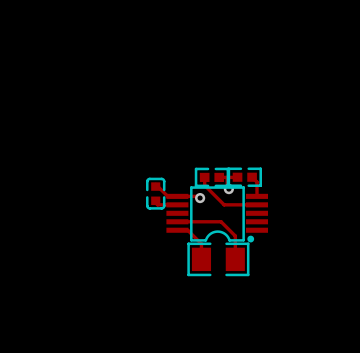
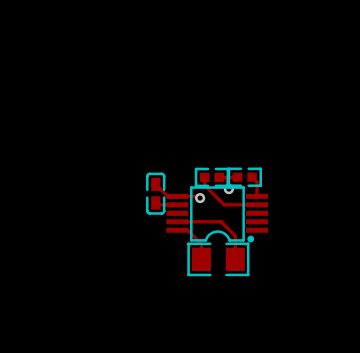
part footprint: [146, 177, 166, 210] -> [146, 172, 166, 215]

